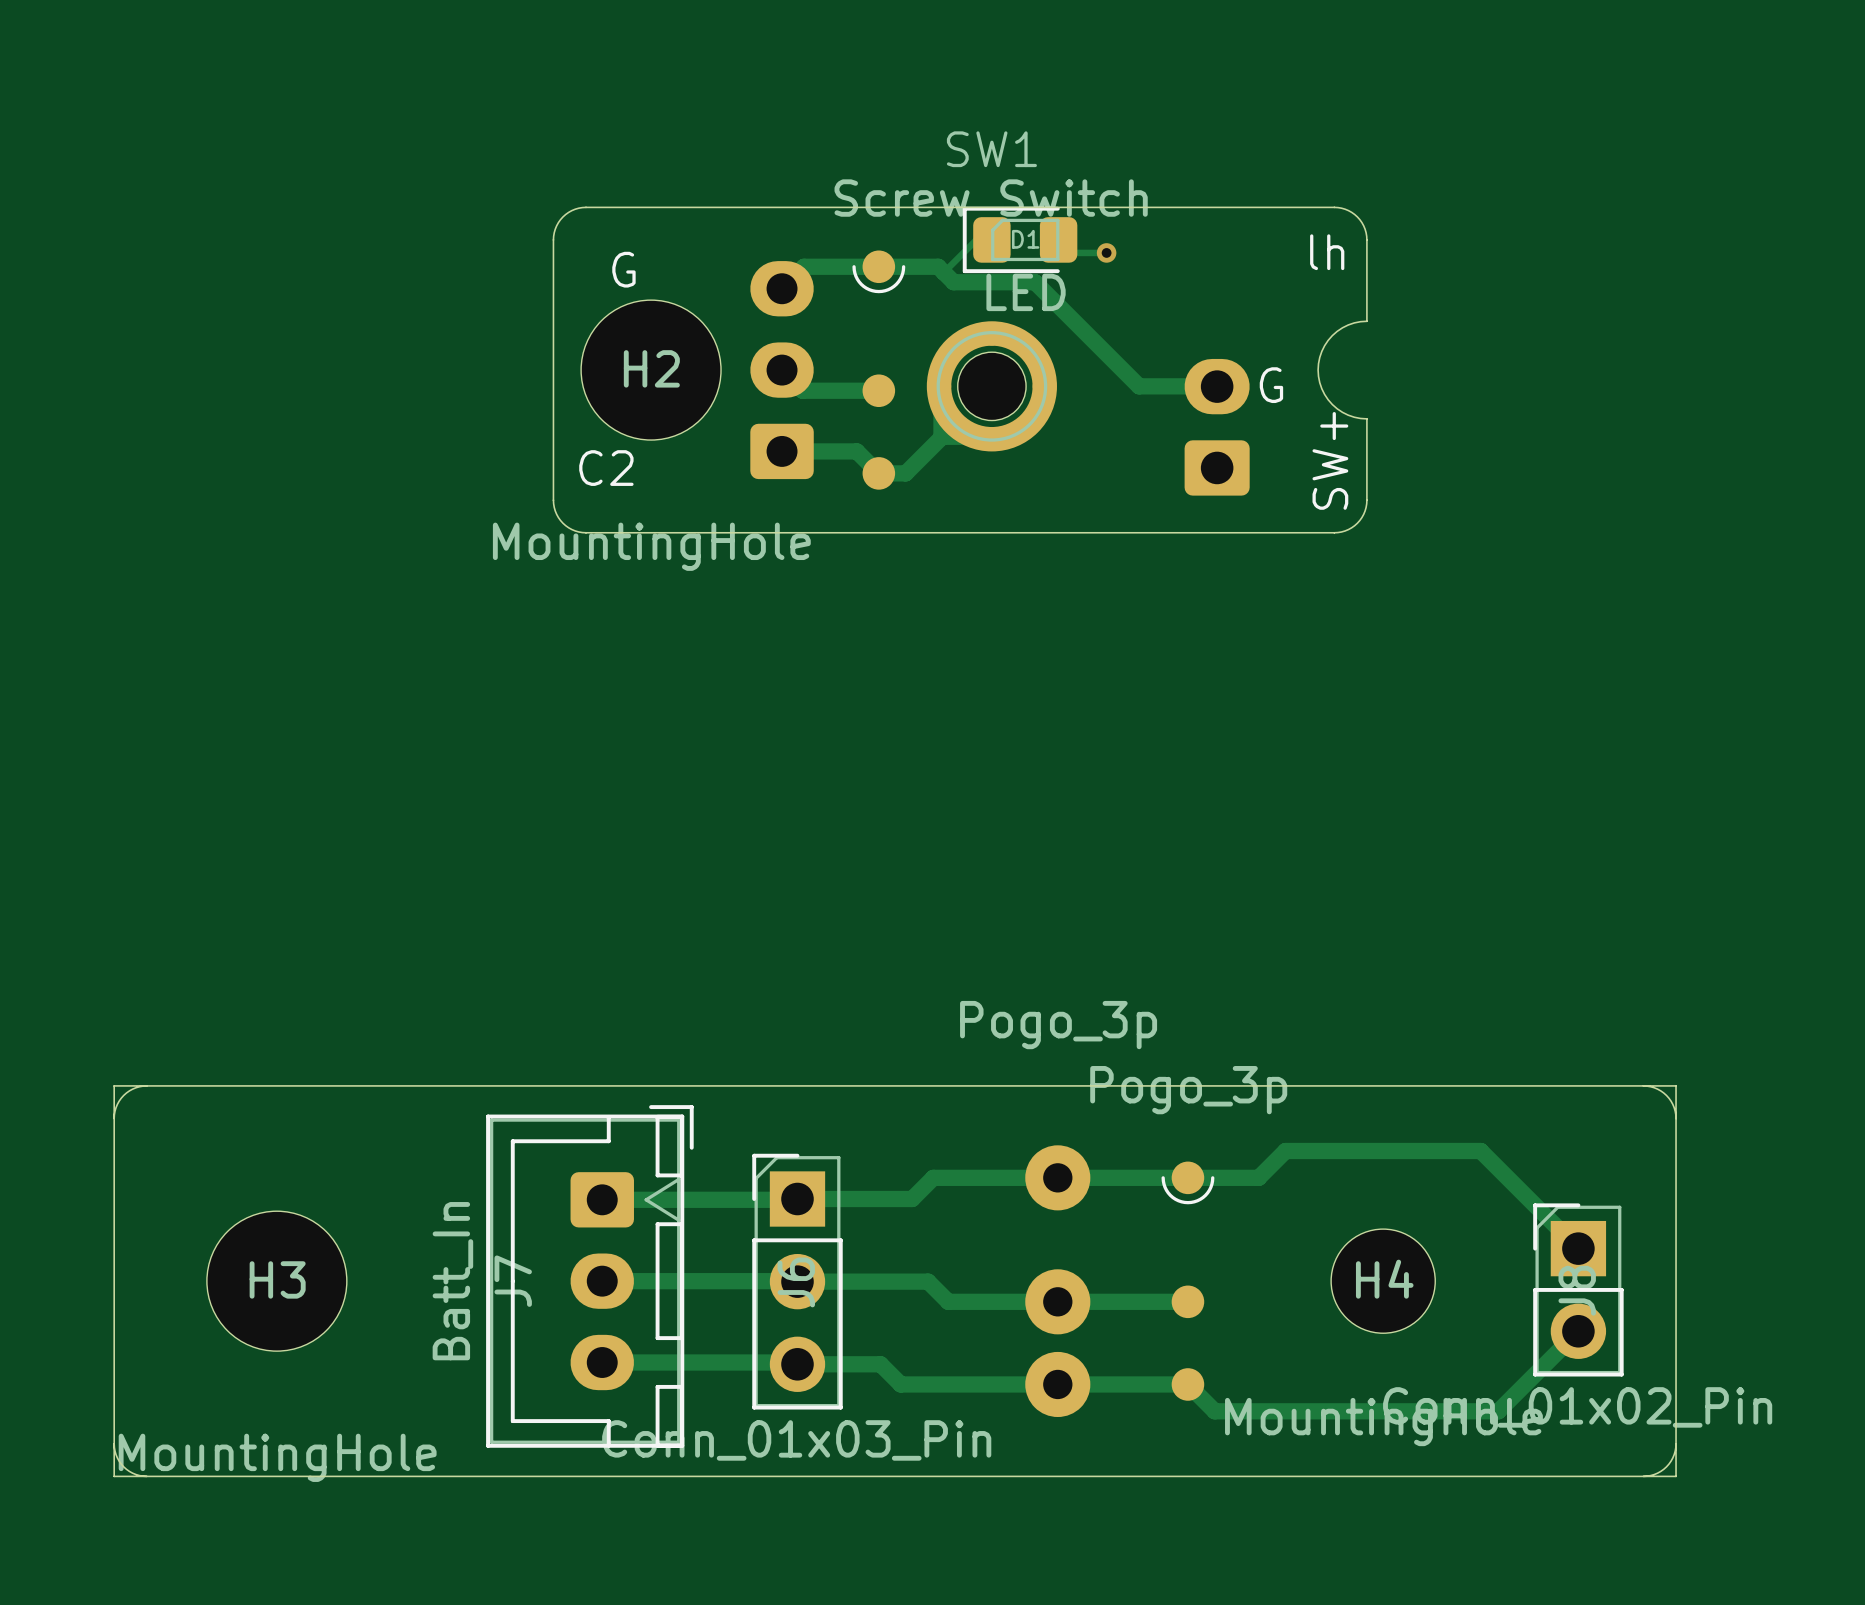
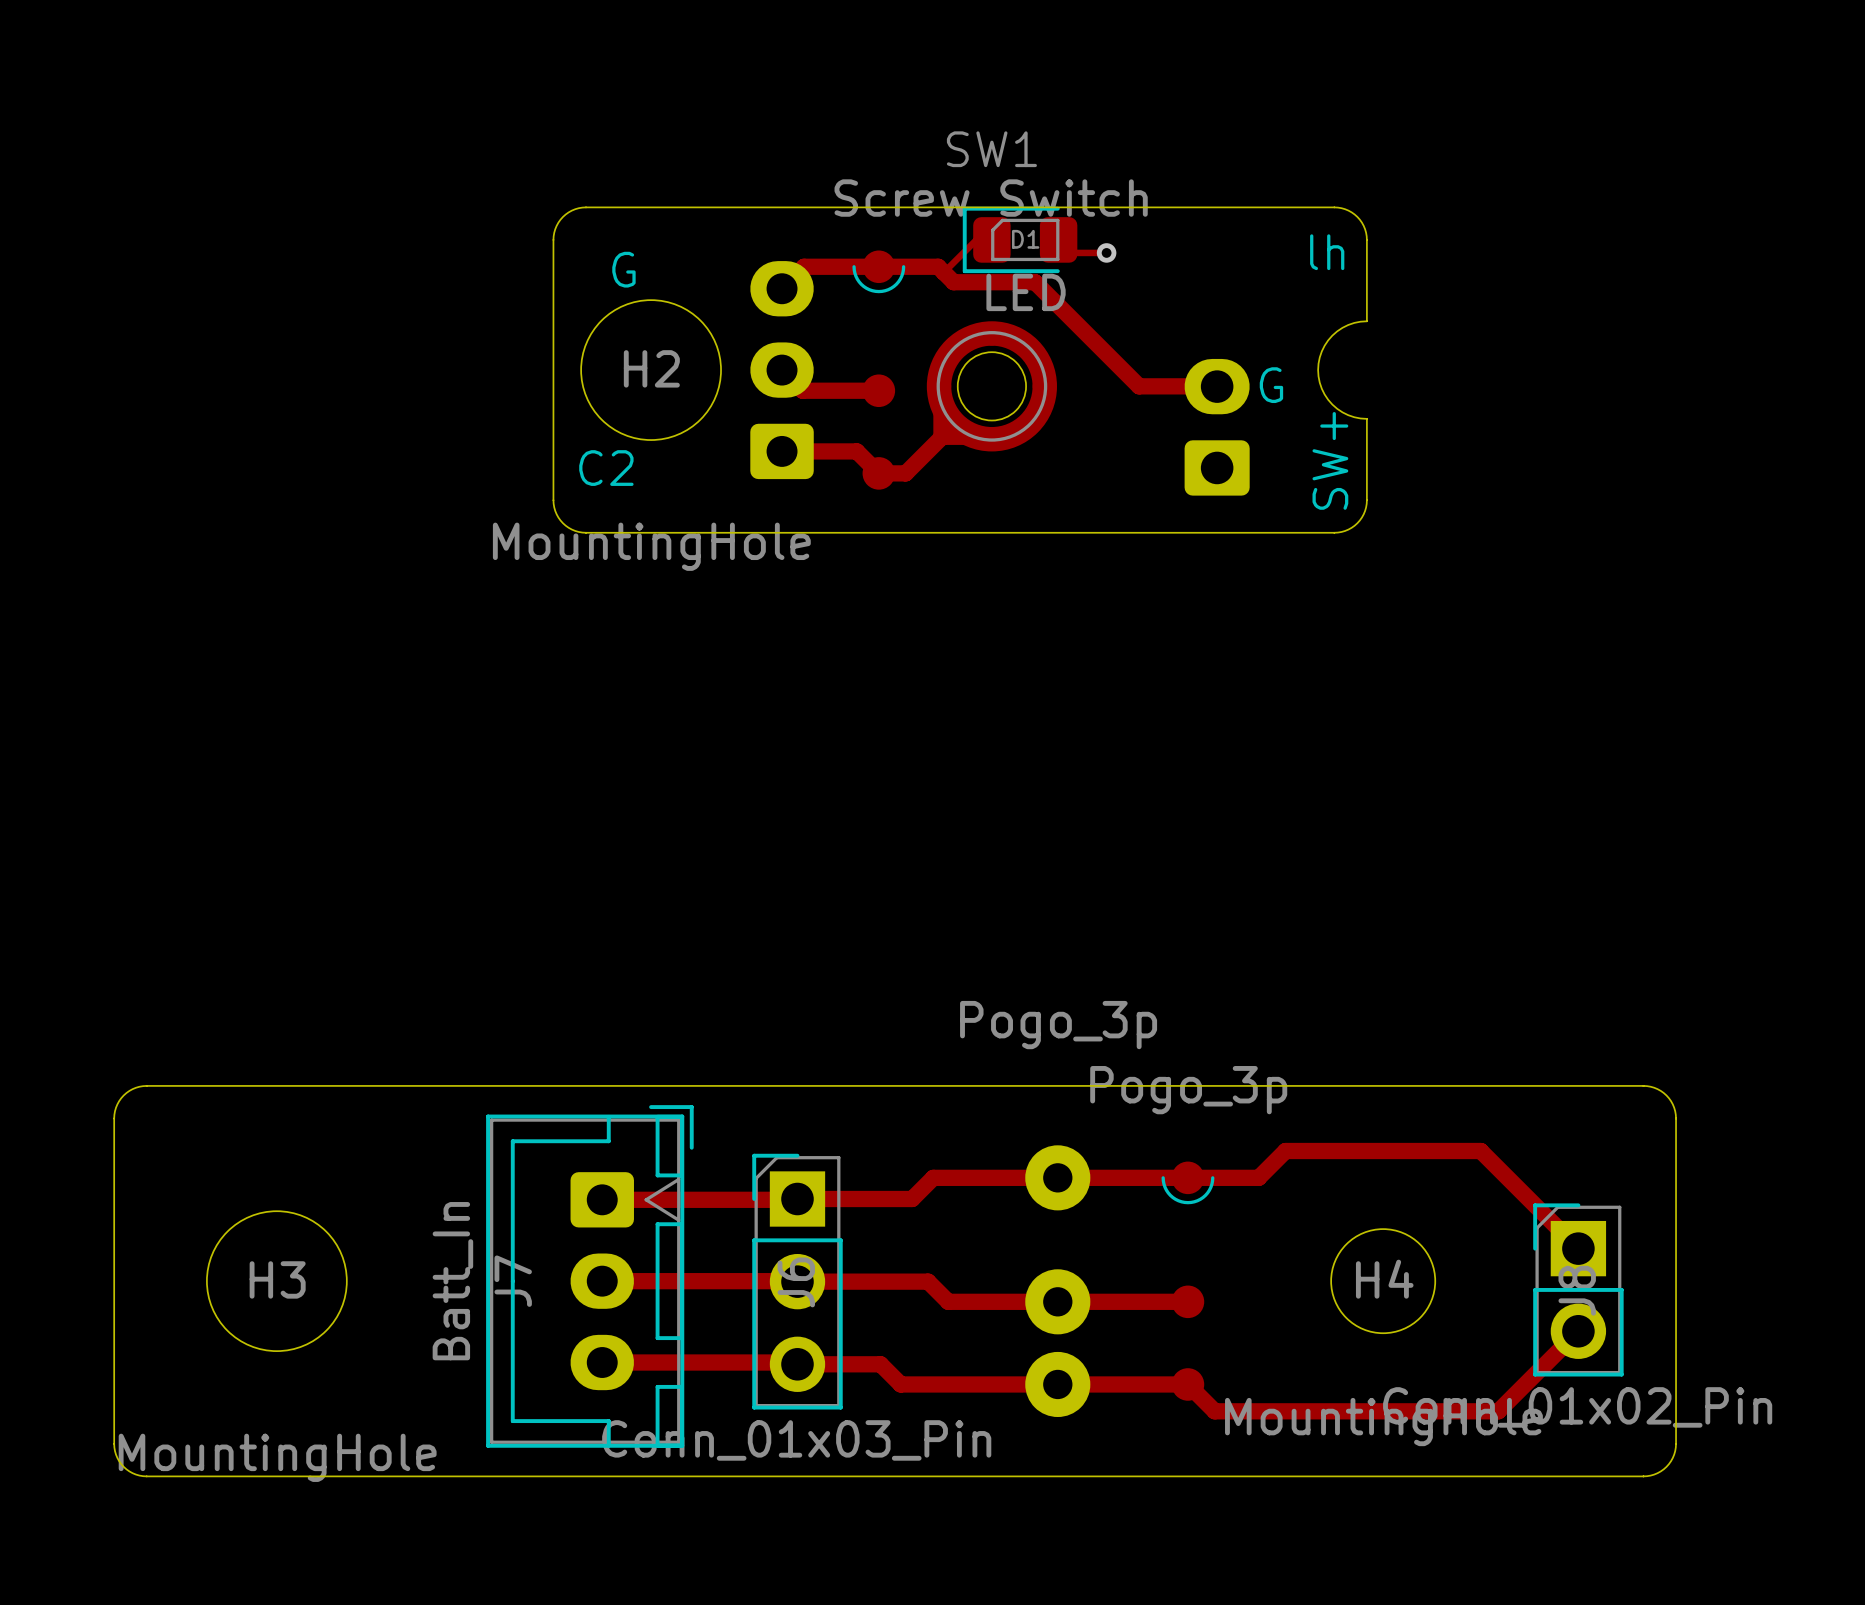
board edge: (146, 1085) (114, 1085) (114, 1118) -> none
board edge: (1643, 1085) (1676, 1085) (1676, 1118) -> none
board edge: (114, 1443) (114, 1476) (146, 1476) -> none
board edge: (1676, 1443) (1676, 1476) (1643, 1476) -> none

